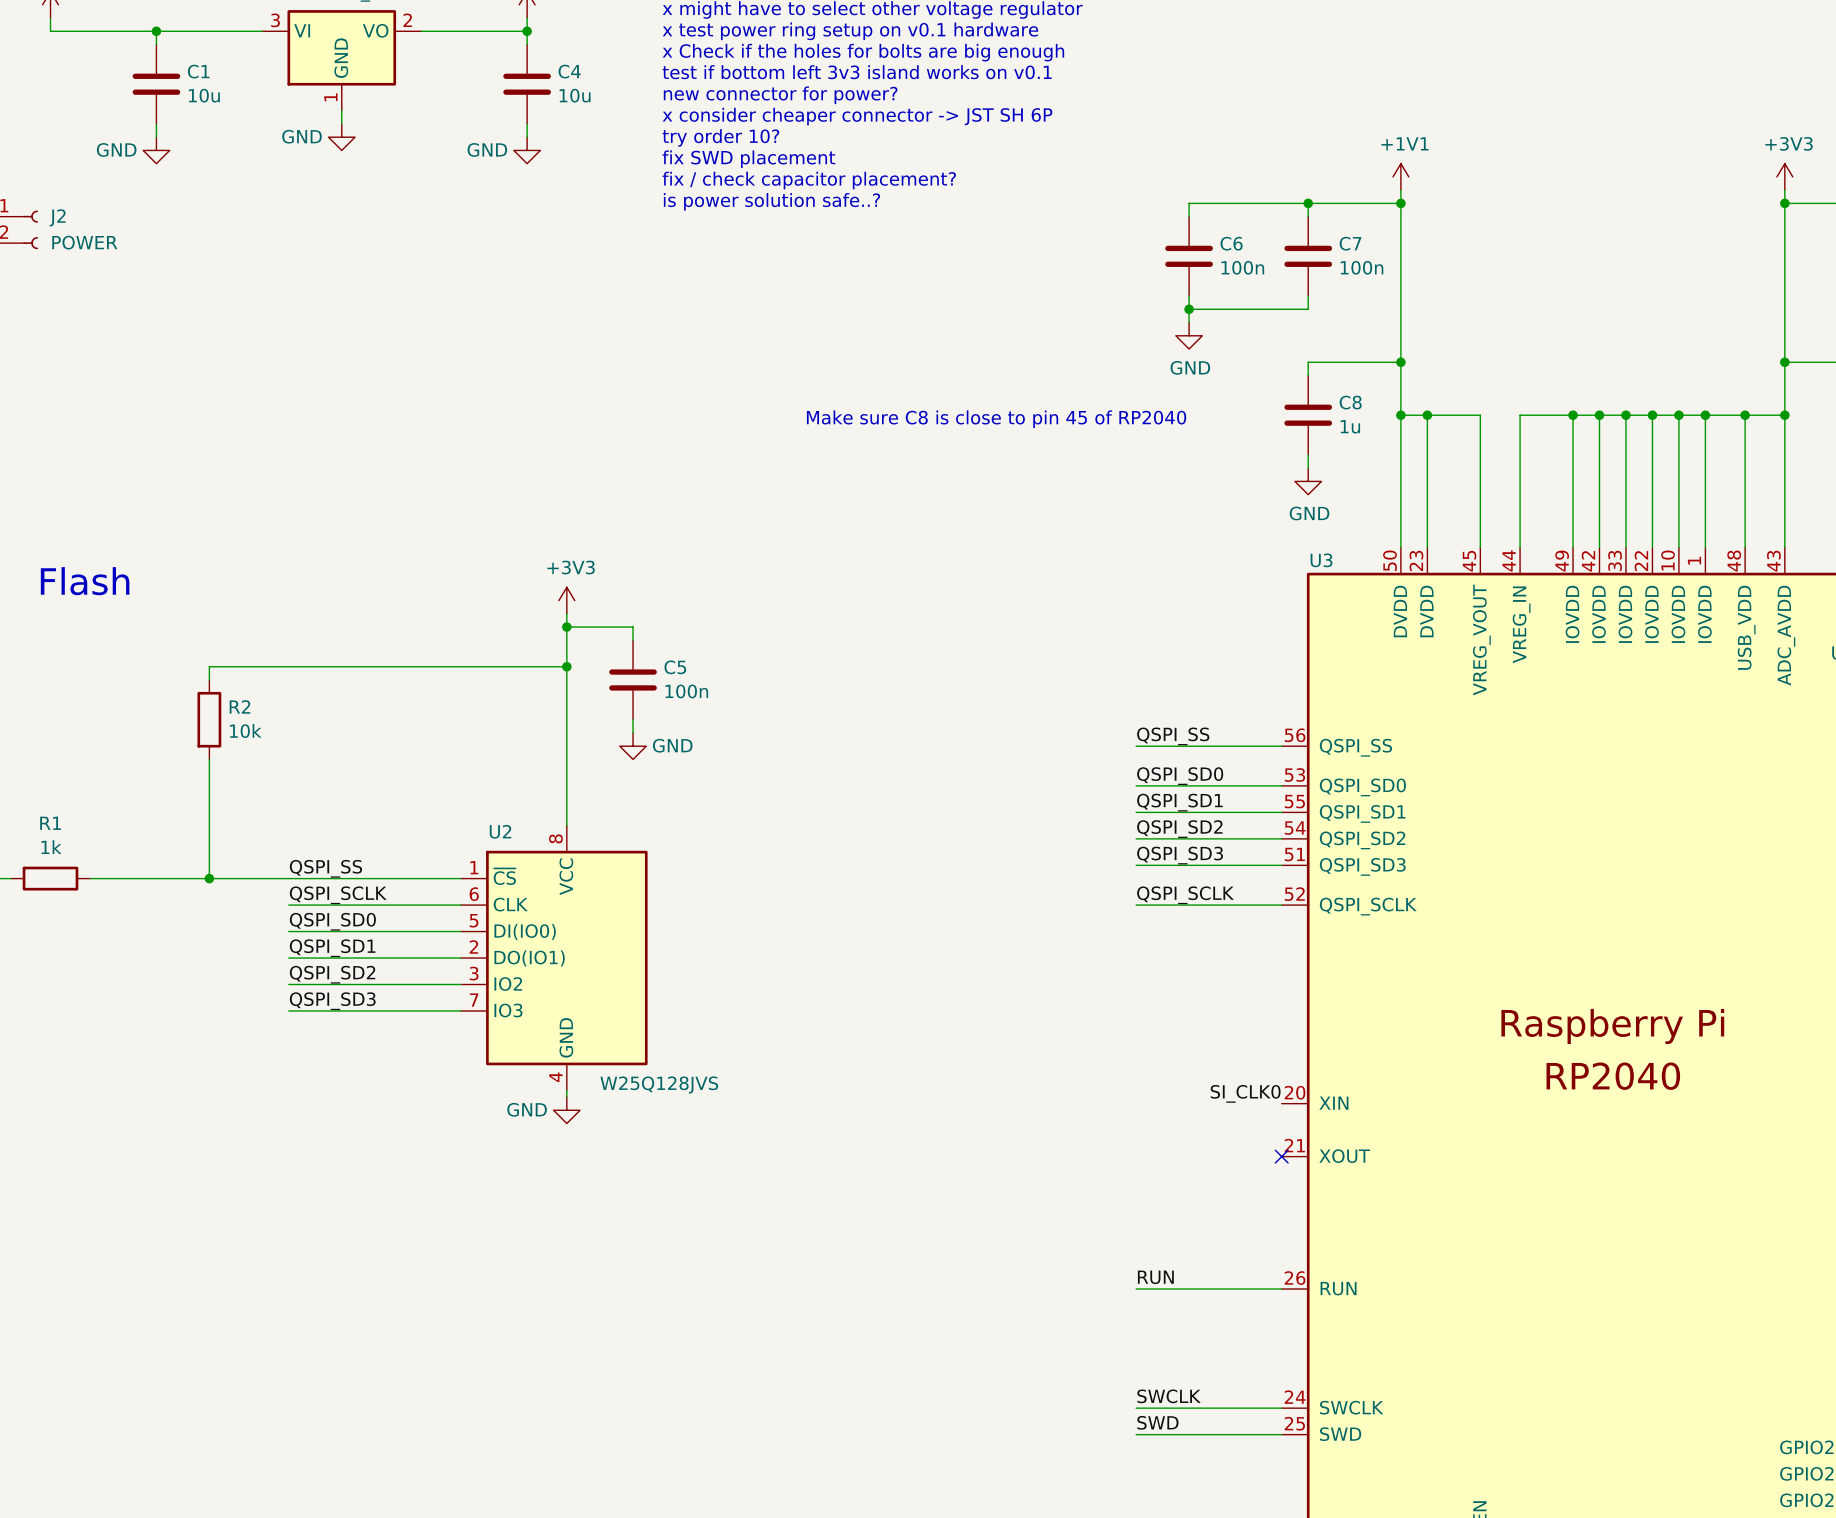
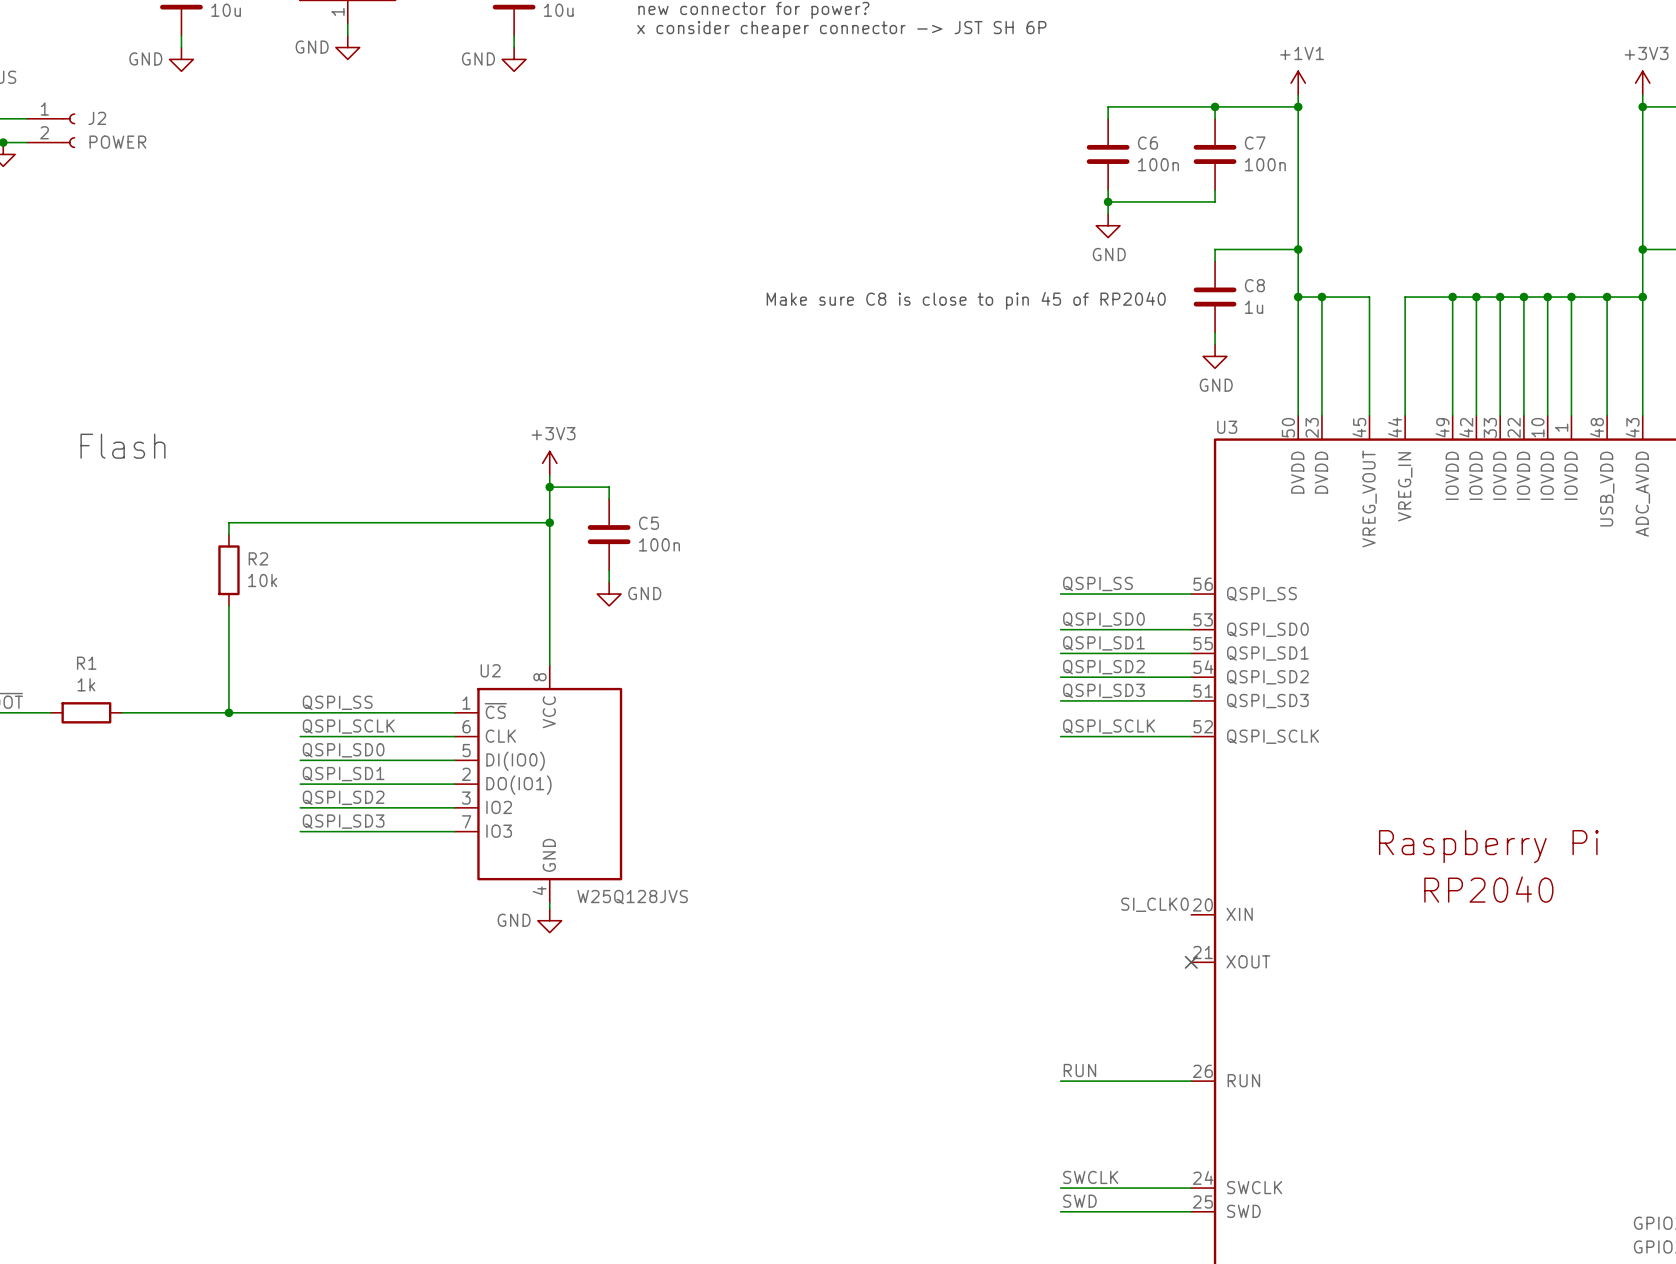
text: try order 10? (720, 137) -> none
text: fix SWD placement (748, 159) -> none
text: fix / check capacitor placement? (809, 180) -> none
text: is power solution safe..? (771, 201) -> none

